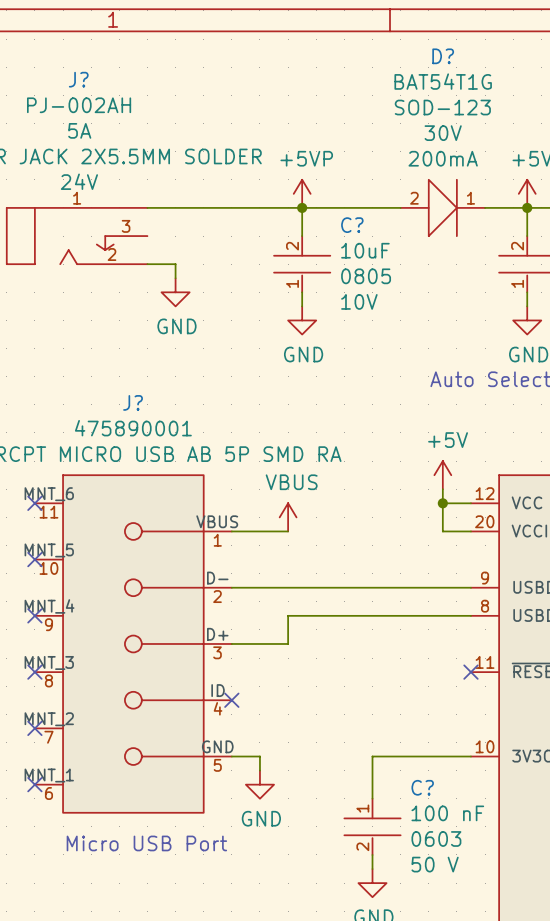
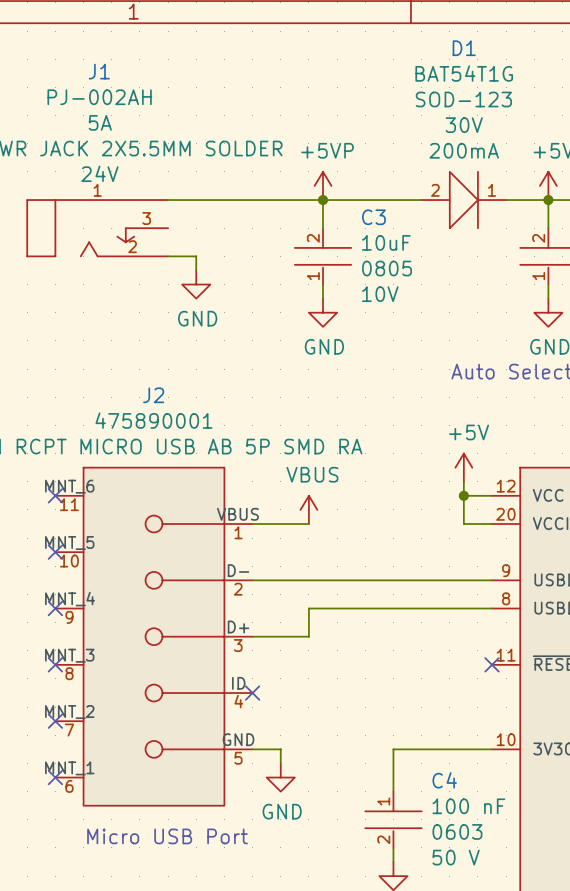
D? name: D? (443, 56) -> D1 (464, 48)
J? name: J? (78, 79) -> J1 (99, 71)
C? name: C? (352, 225) -> C3 (373, 217)
J? name: J? (133, 402) -> J2 (153, 395)
C? name: C? (422, 787) -> C4 (444, 780)

